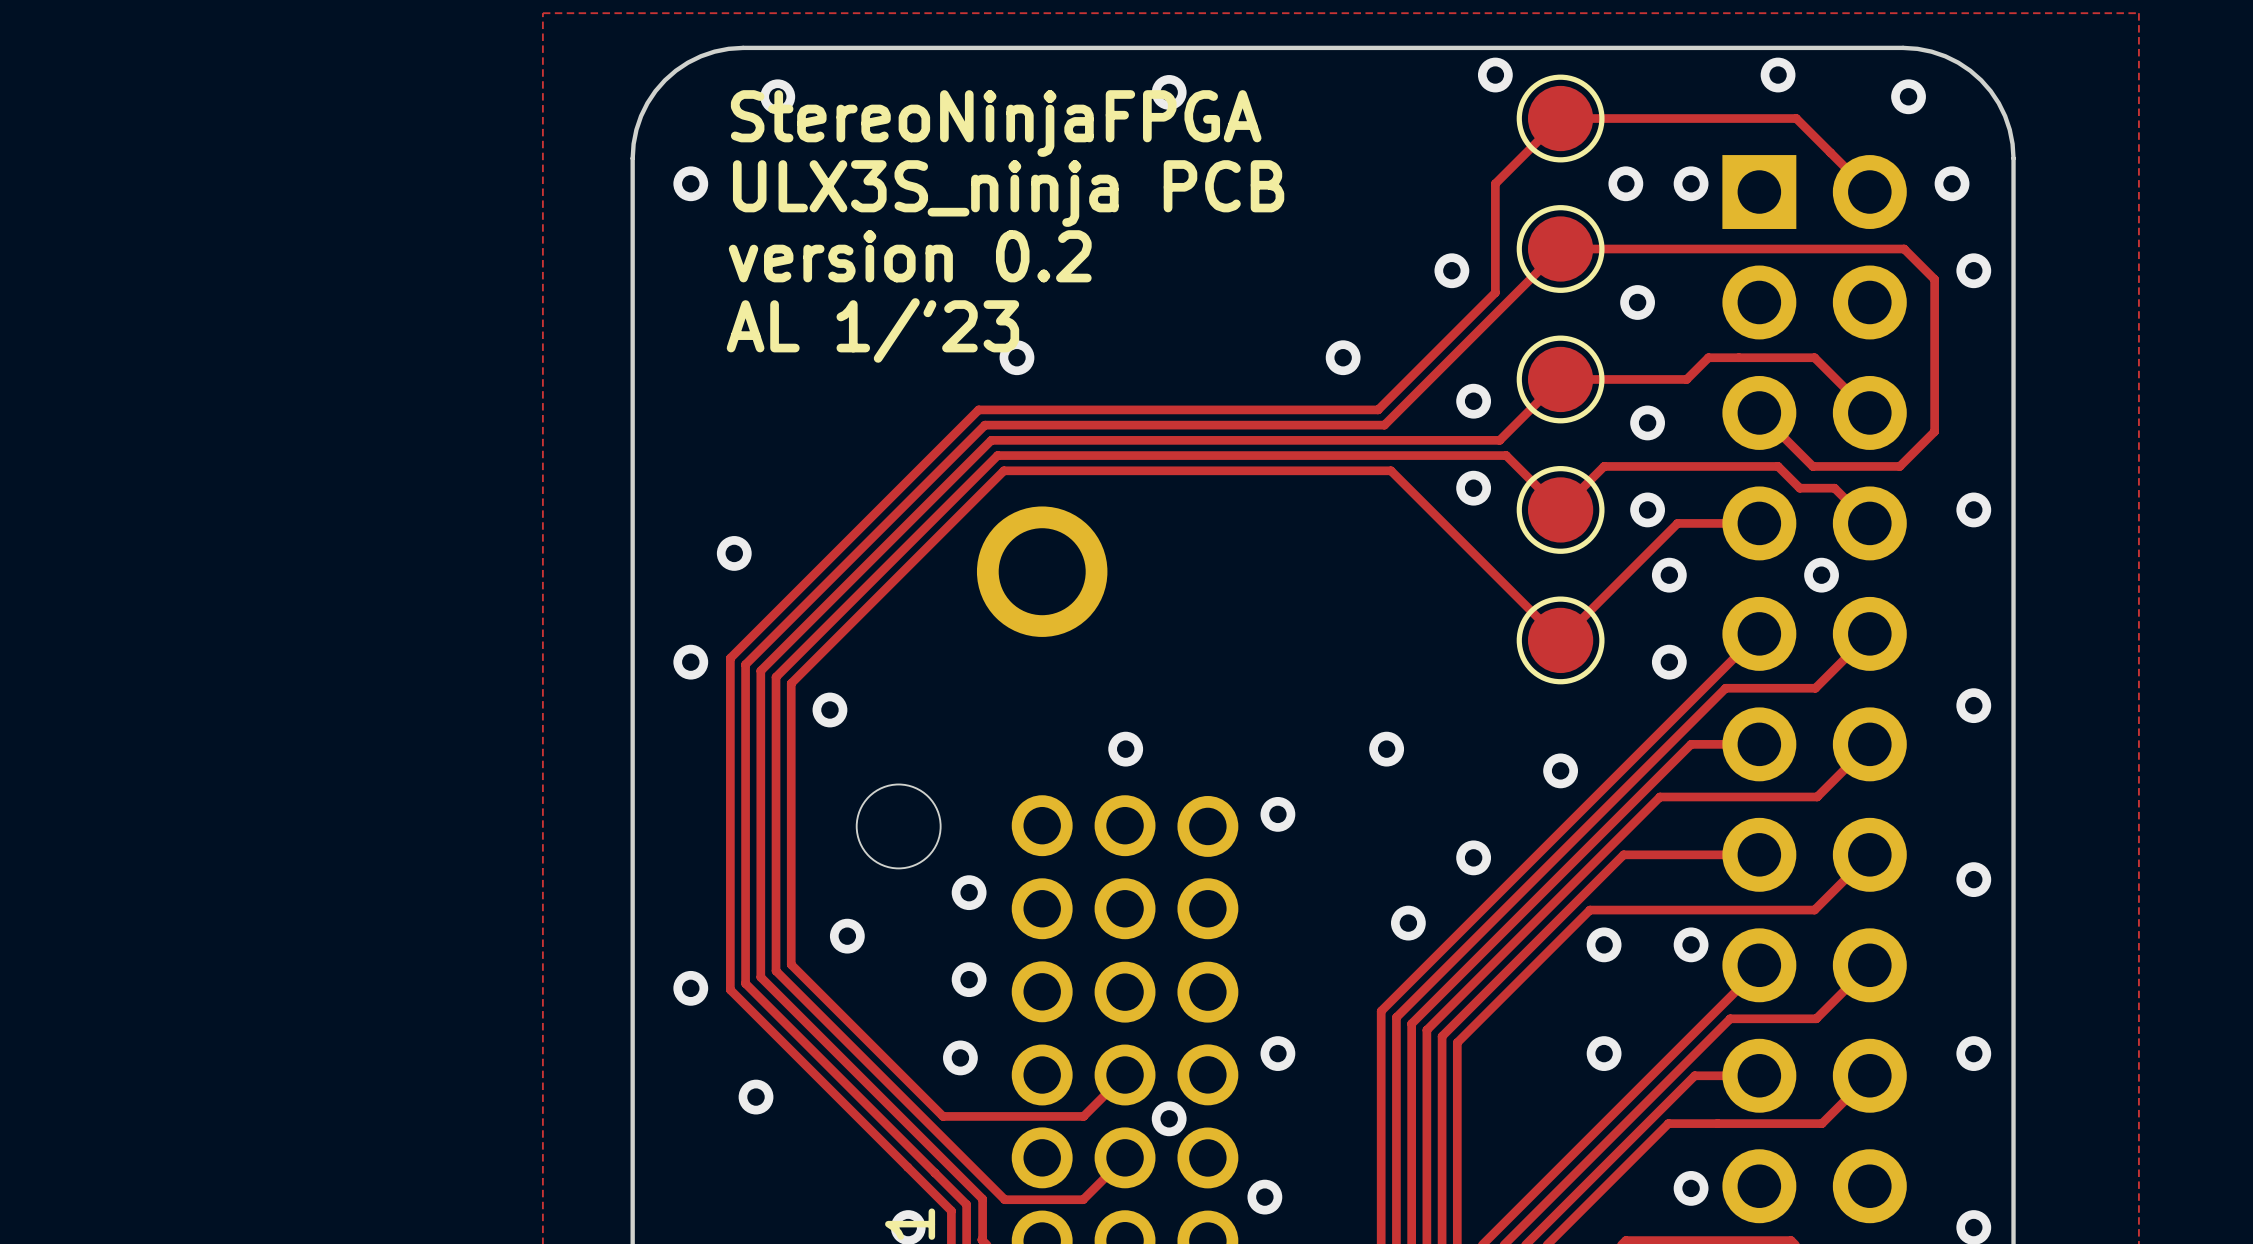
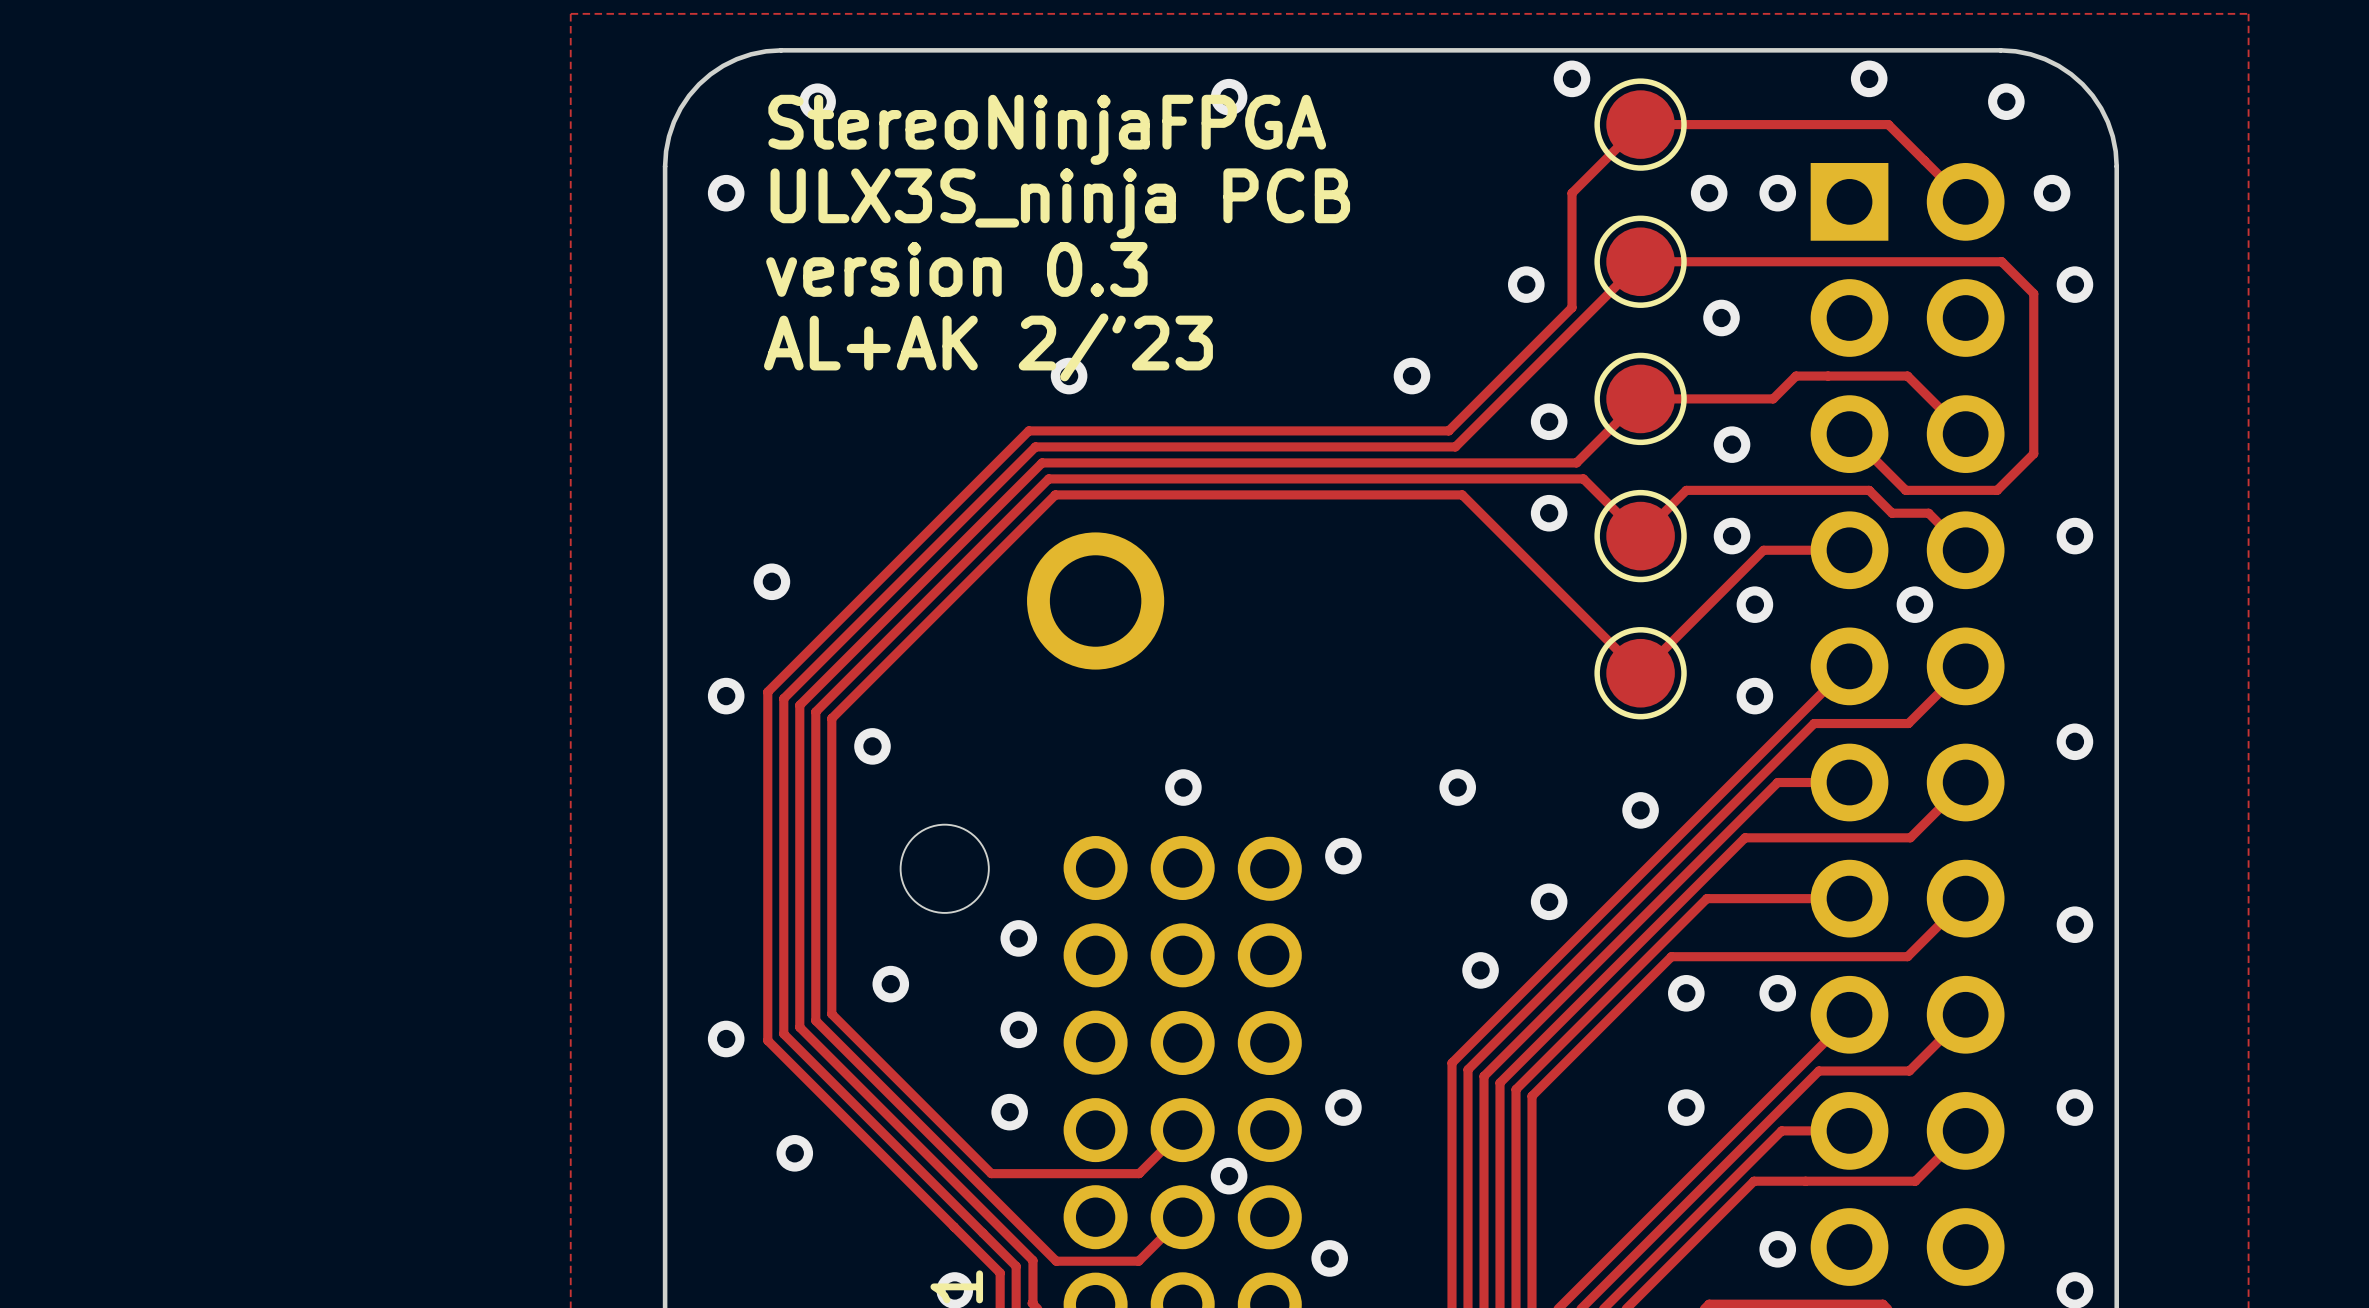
text: version 0.2 (910, 256) -> version 0.3 (956, 269)
text: AL 1/'23 (872, 330) -> AL+AK 2/'23 (988, 347)

